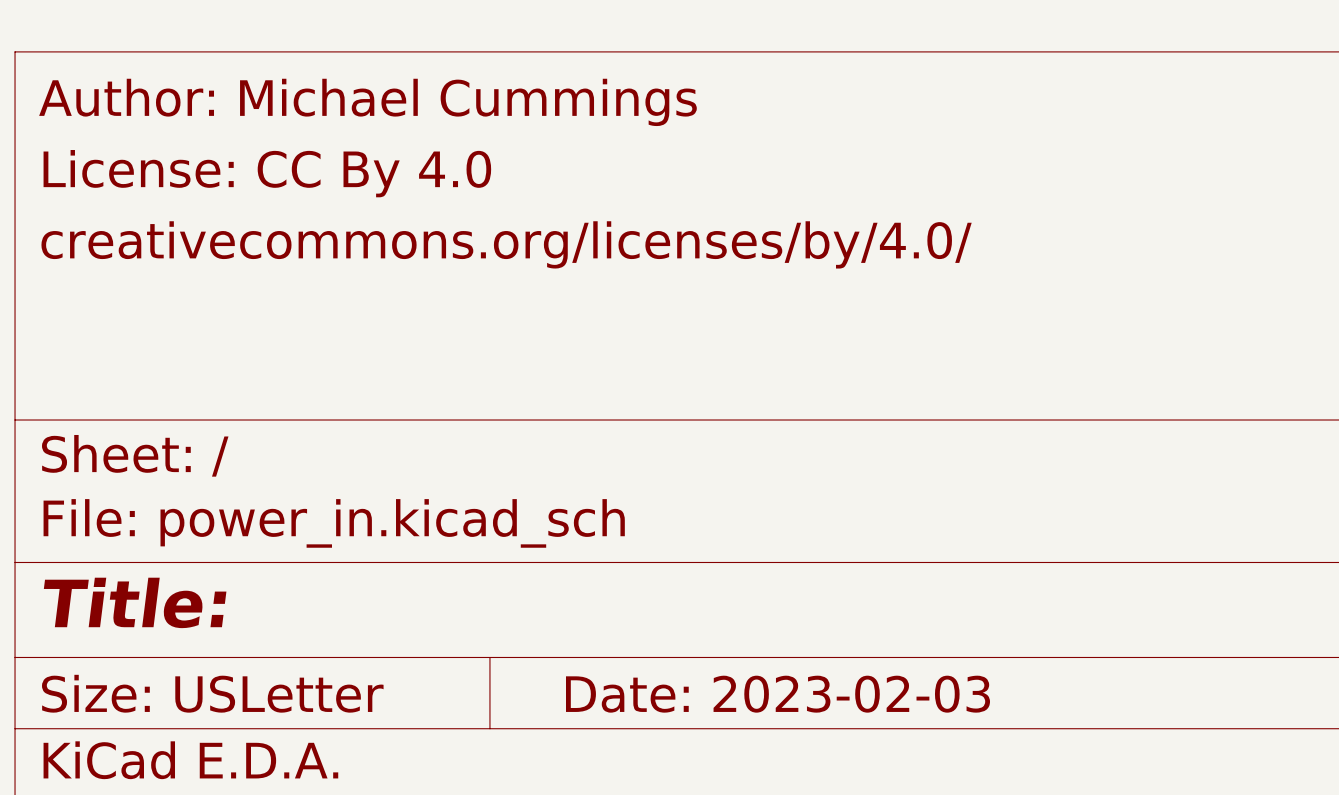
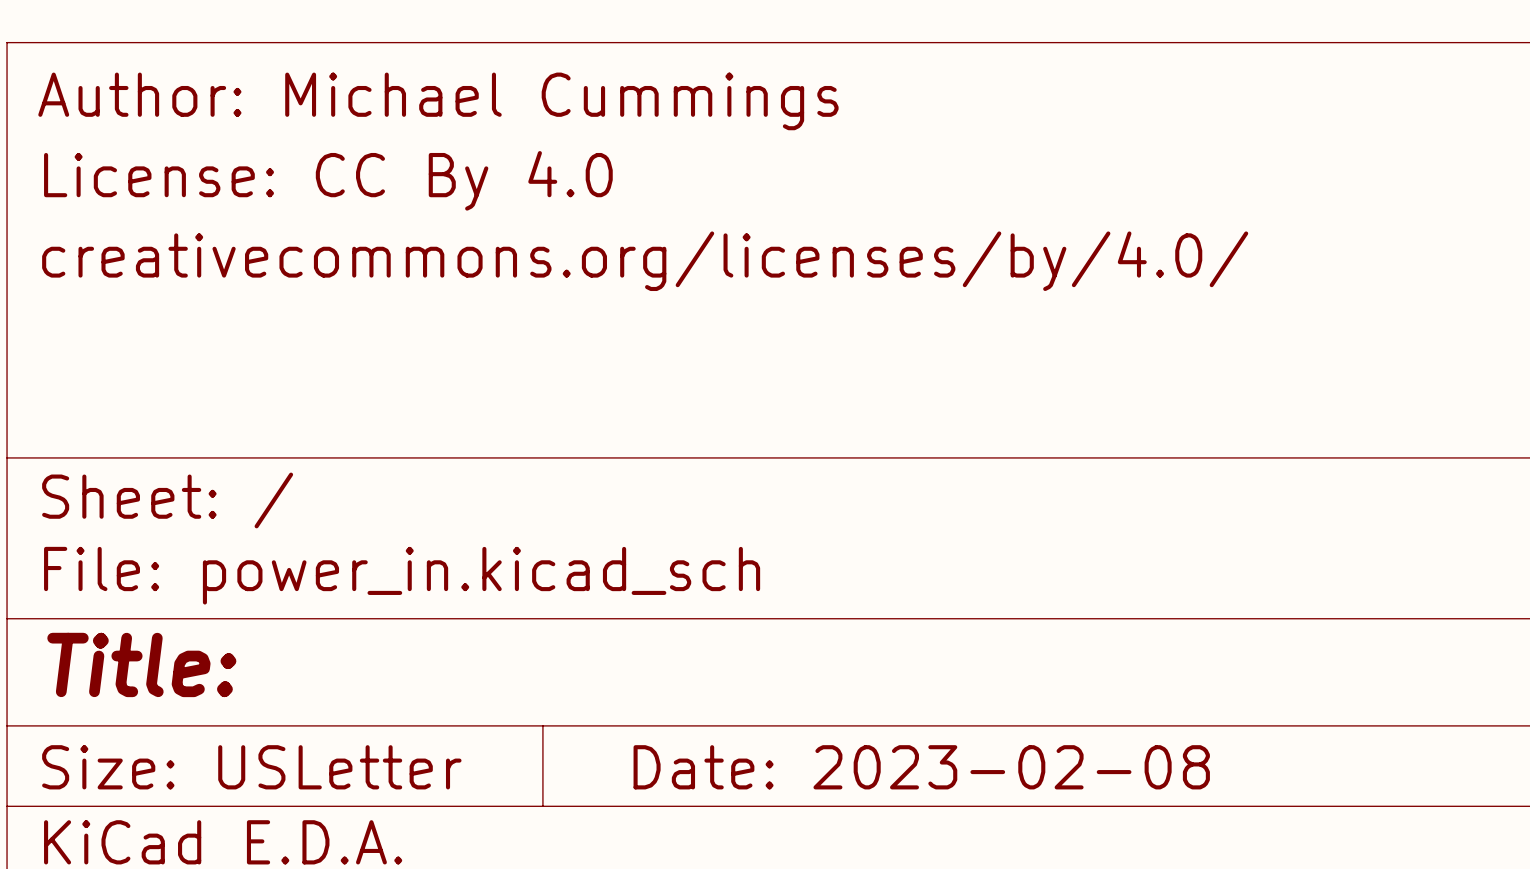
title block: Date: 2023-02-03 (778, 694) -> Date: 2023-02-08 (921, 767)

